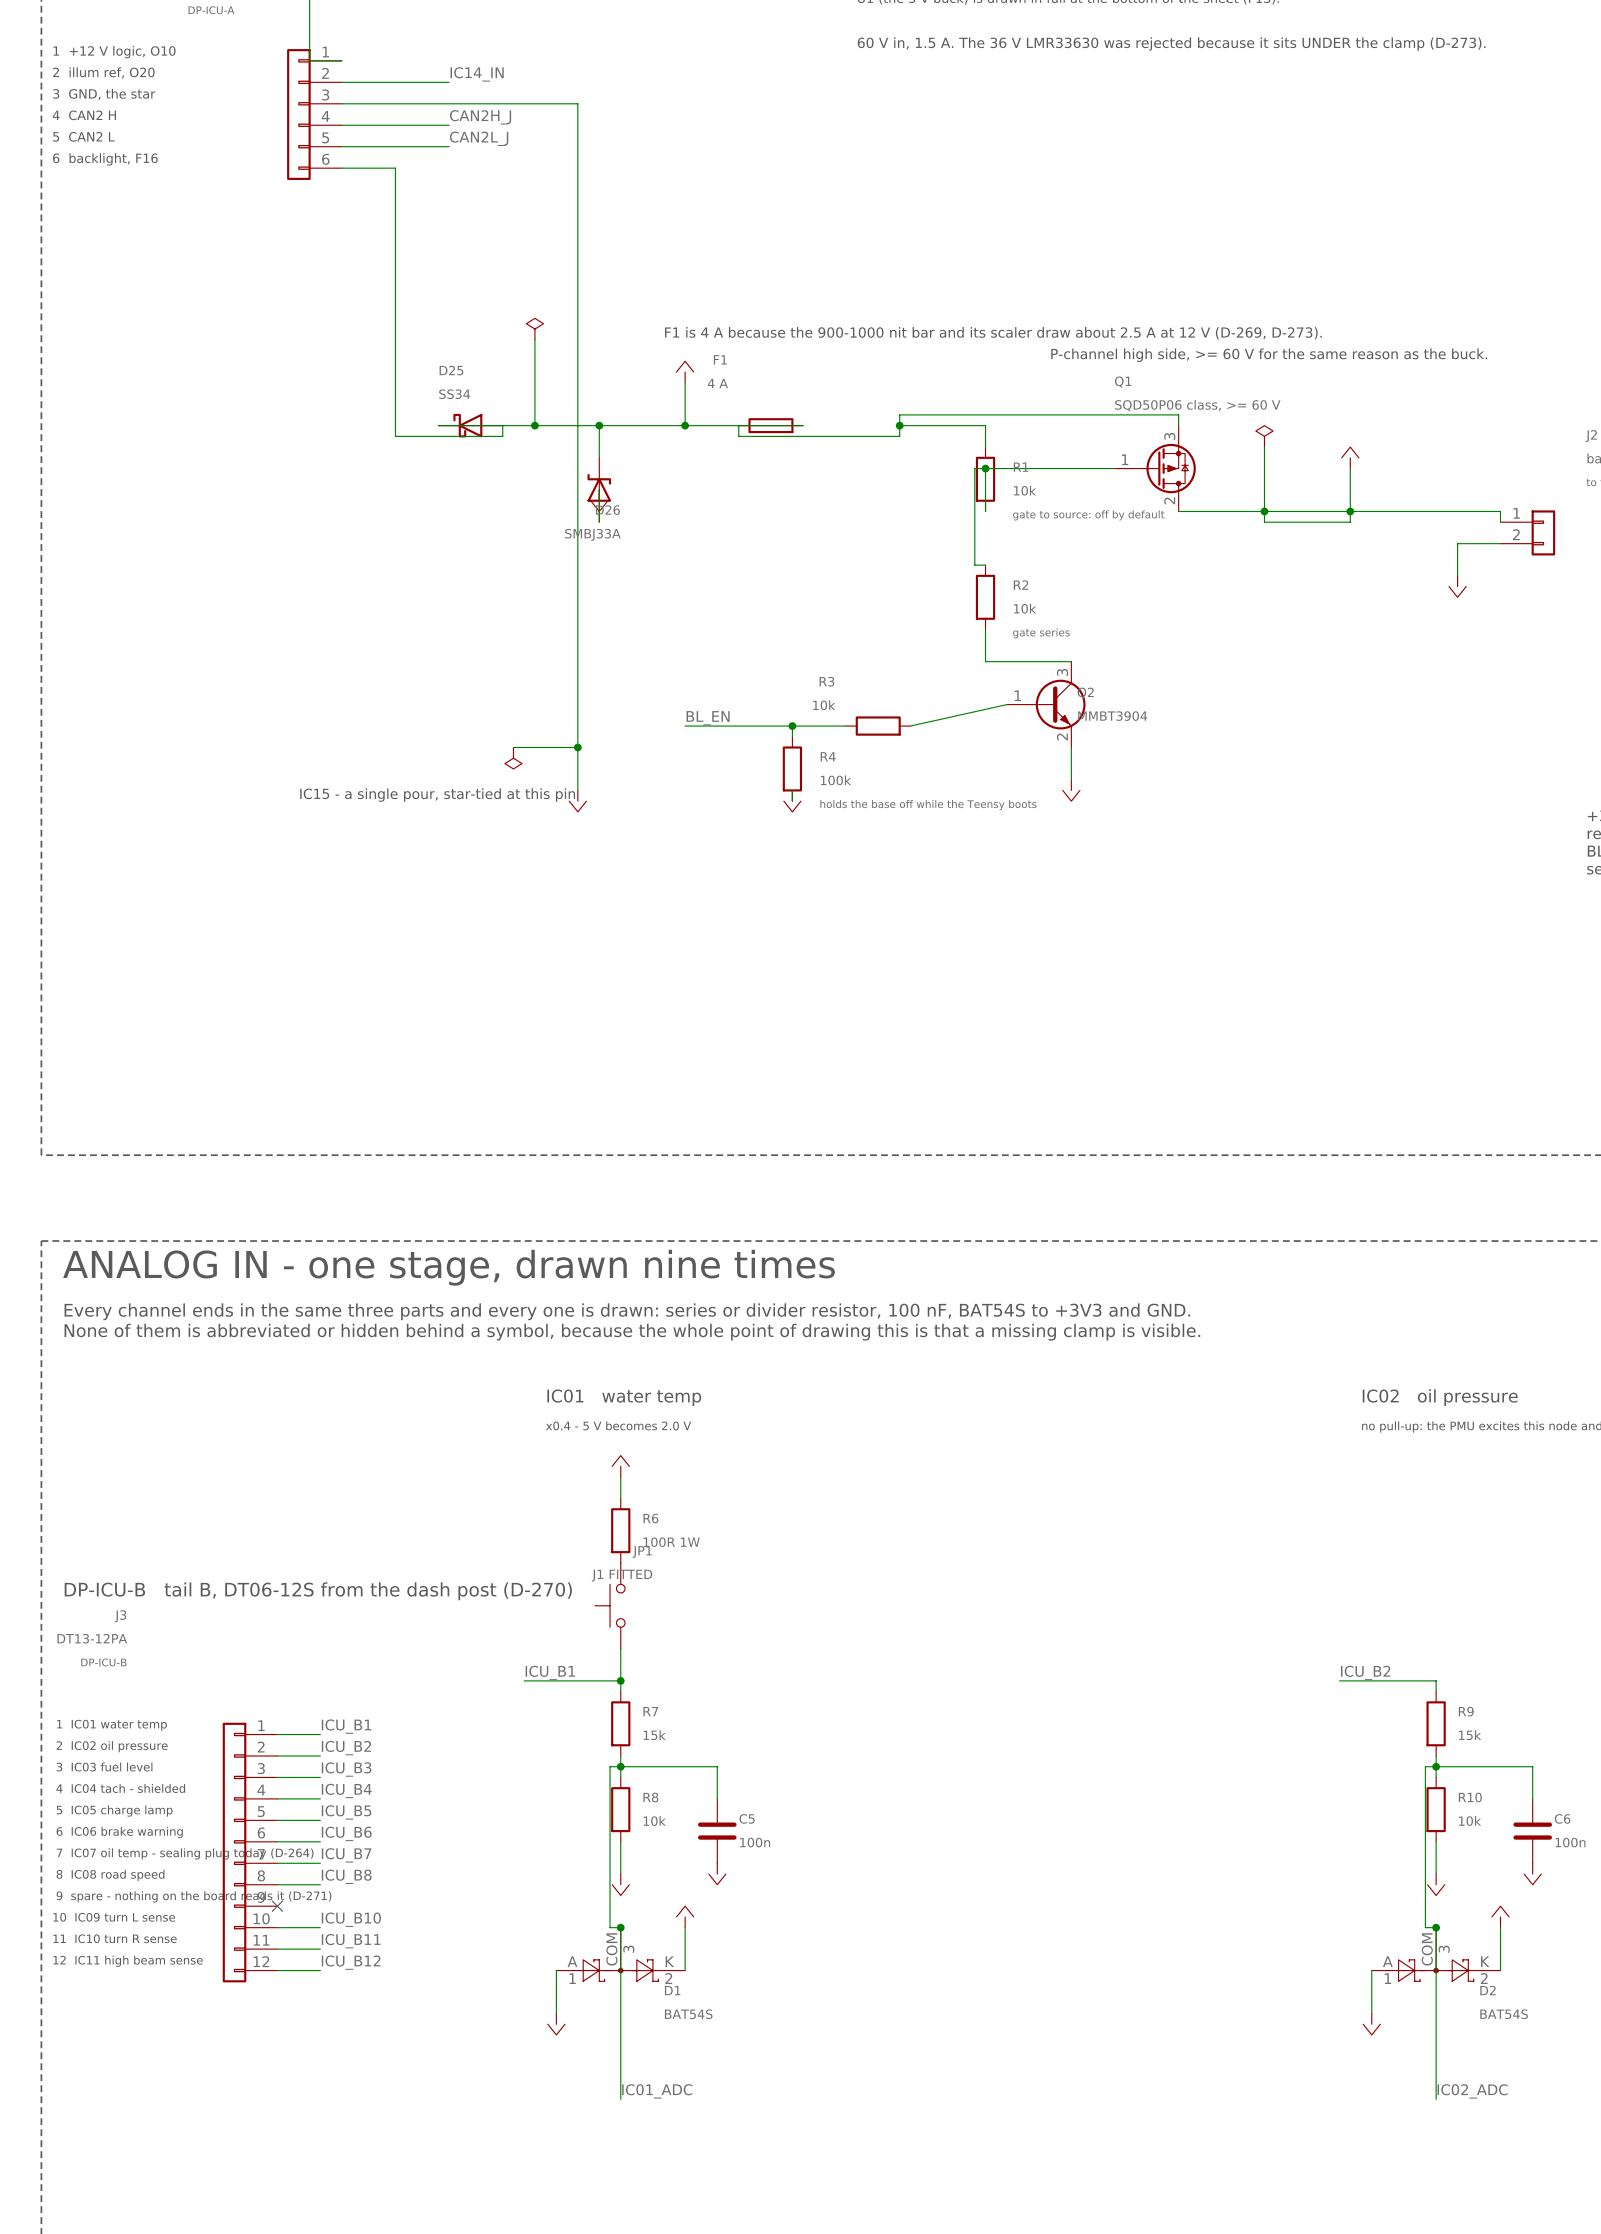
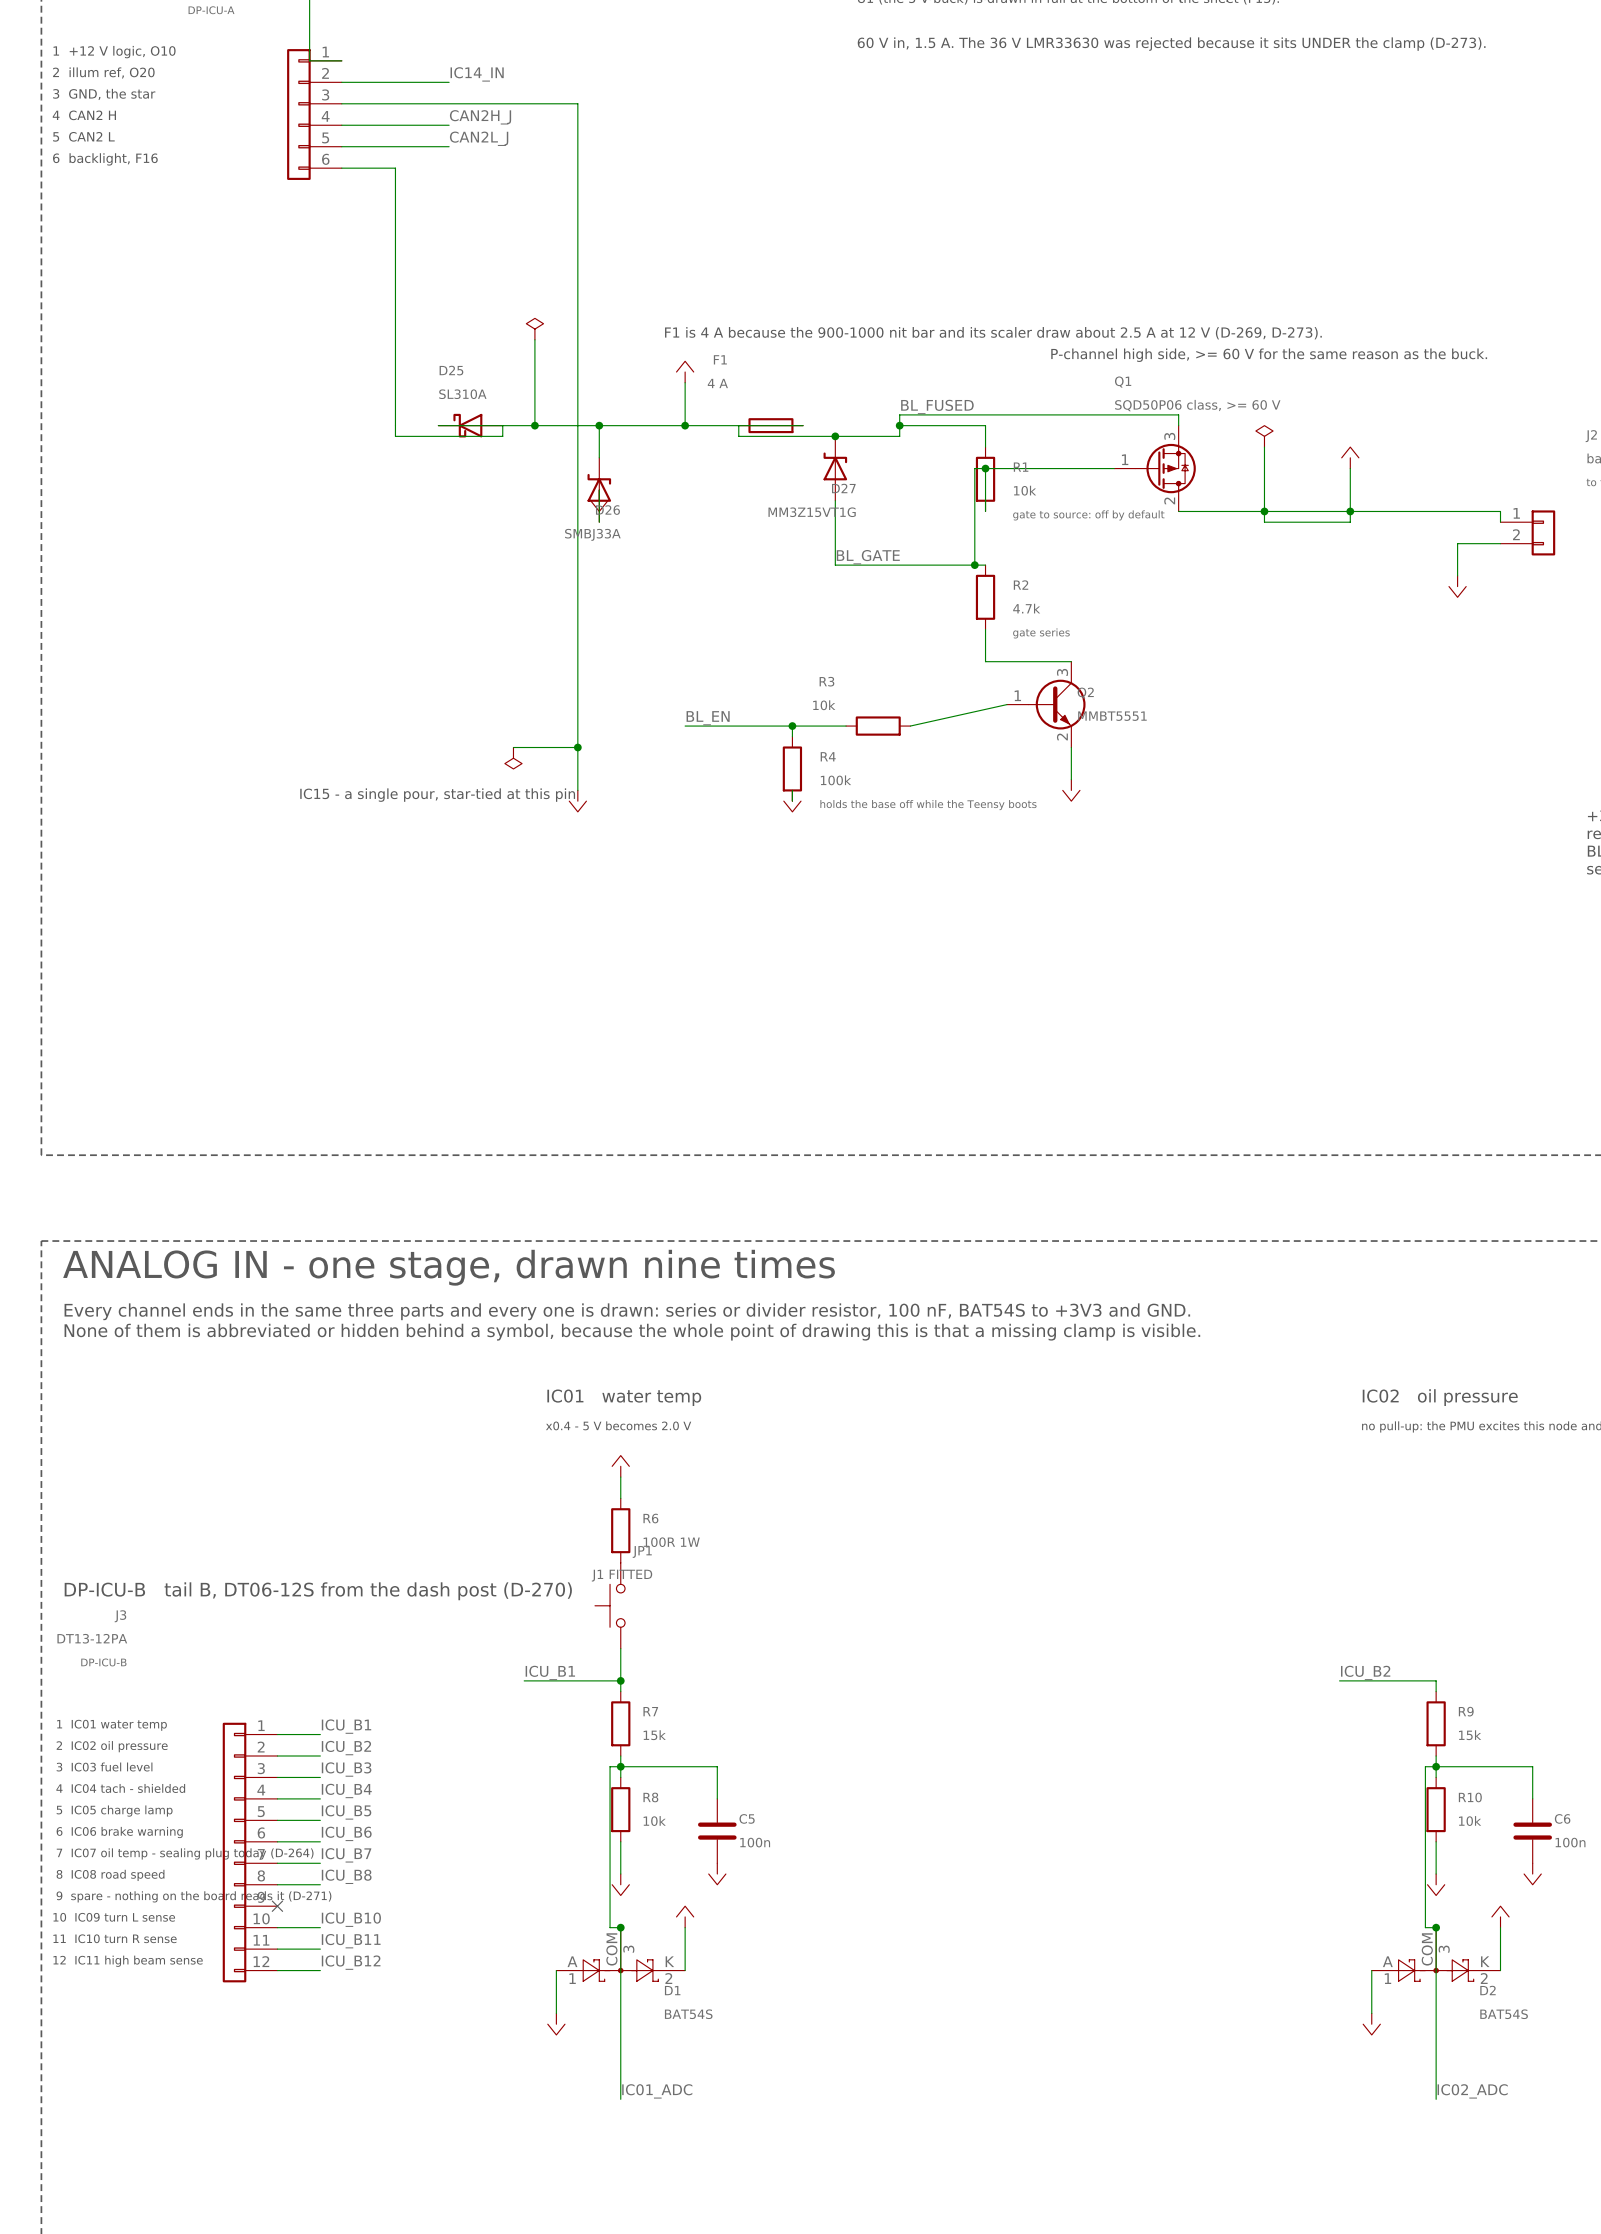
D25 value: SS34 (454, 394) -> SL310A (462, 394)
label: none -> BL_FUSED (937, 406)
junction: none -> (835, 436)
D27: none -> MM3Z15VT1G (835, 468)
wire: none -> (835, 500) (835, 565) (974, 565)
label: none -> BL_GATE (868, 557)
junction: none -> (974, 565)
R2 value: 10k (1025, 608) -> 4.7k (1026, 608)
Q2 value: MMBT3904 (1112, 716) -> MMBT5551 (1112, 716)

